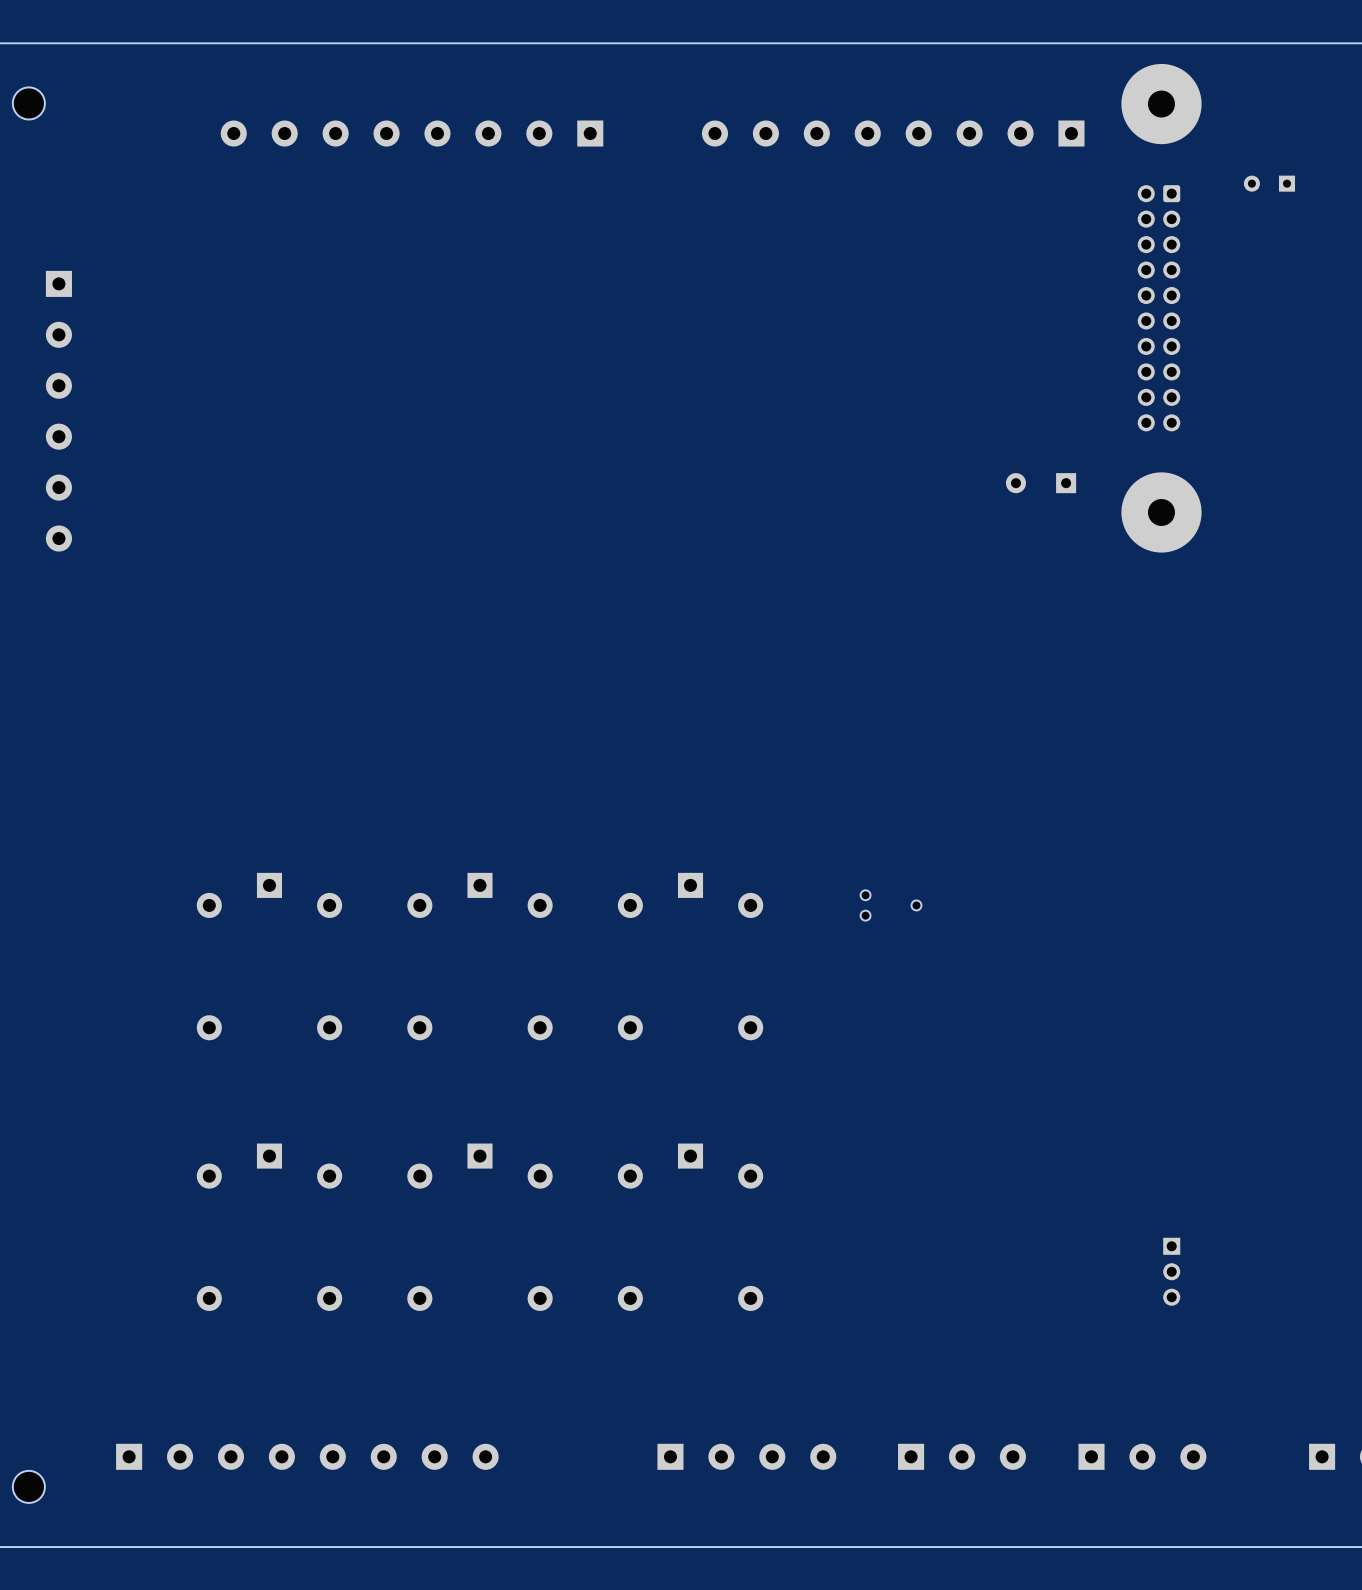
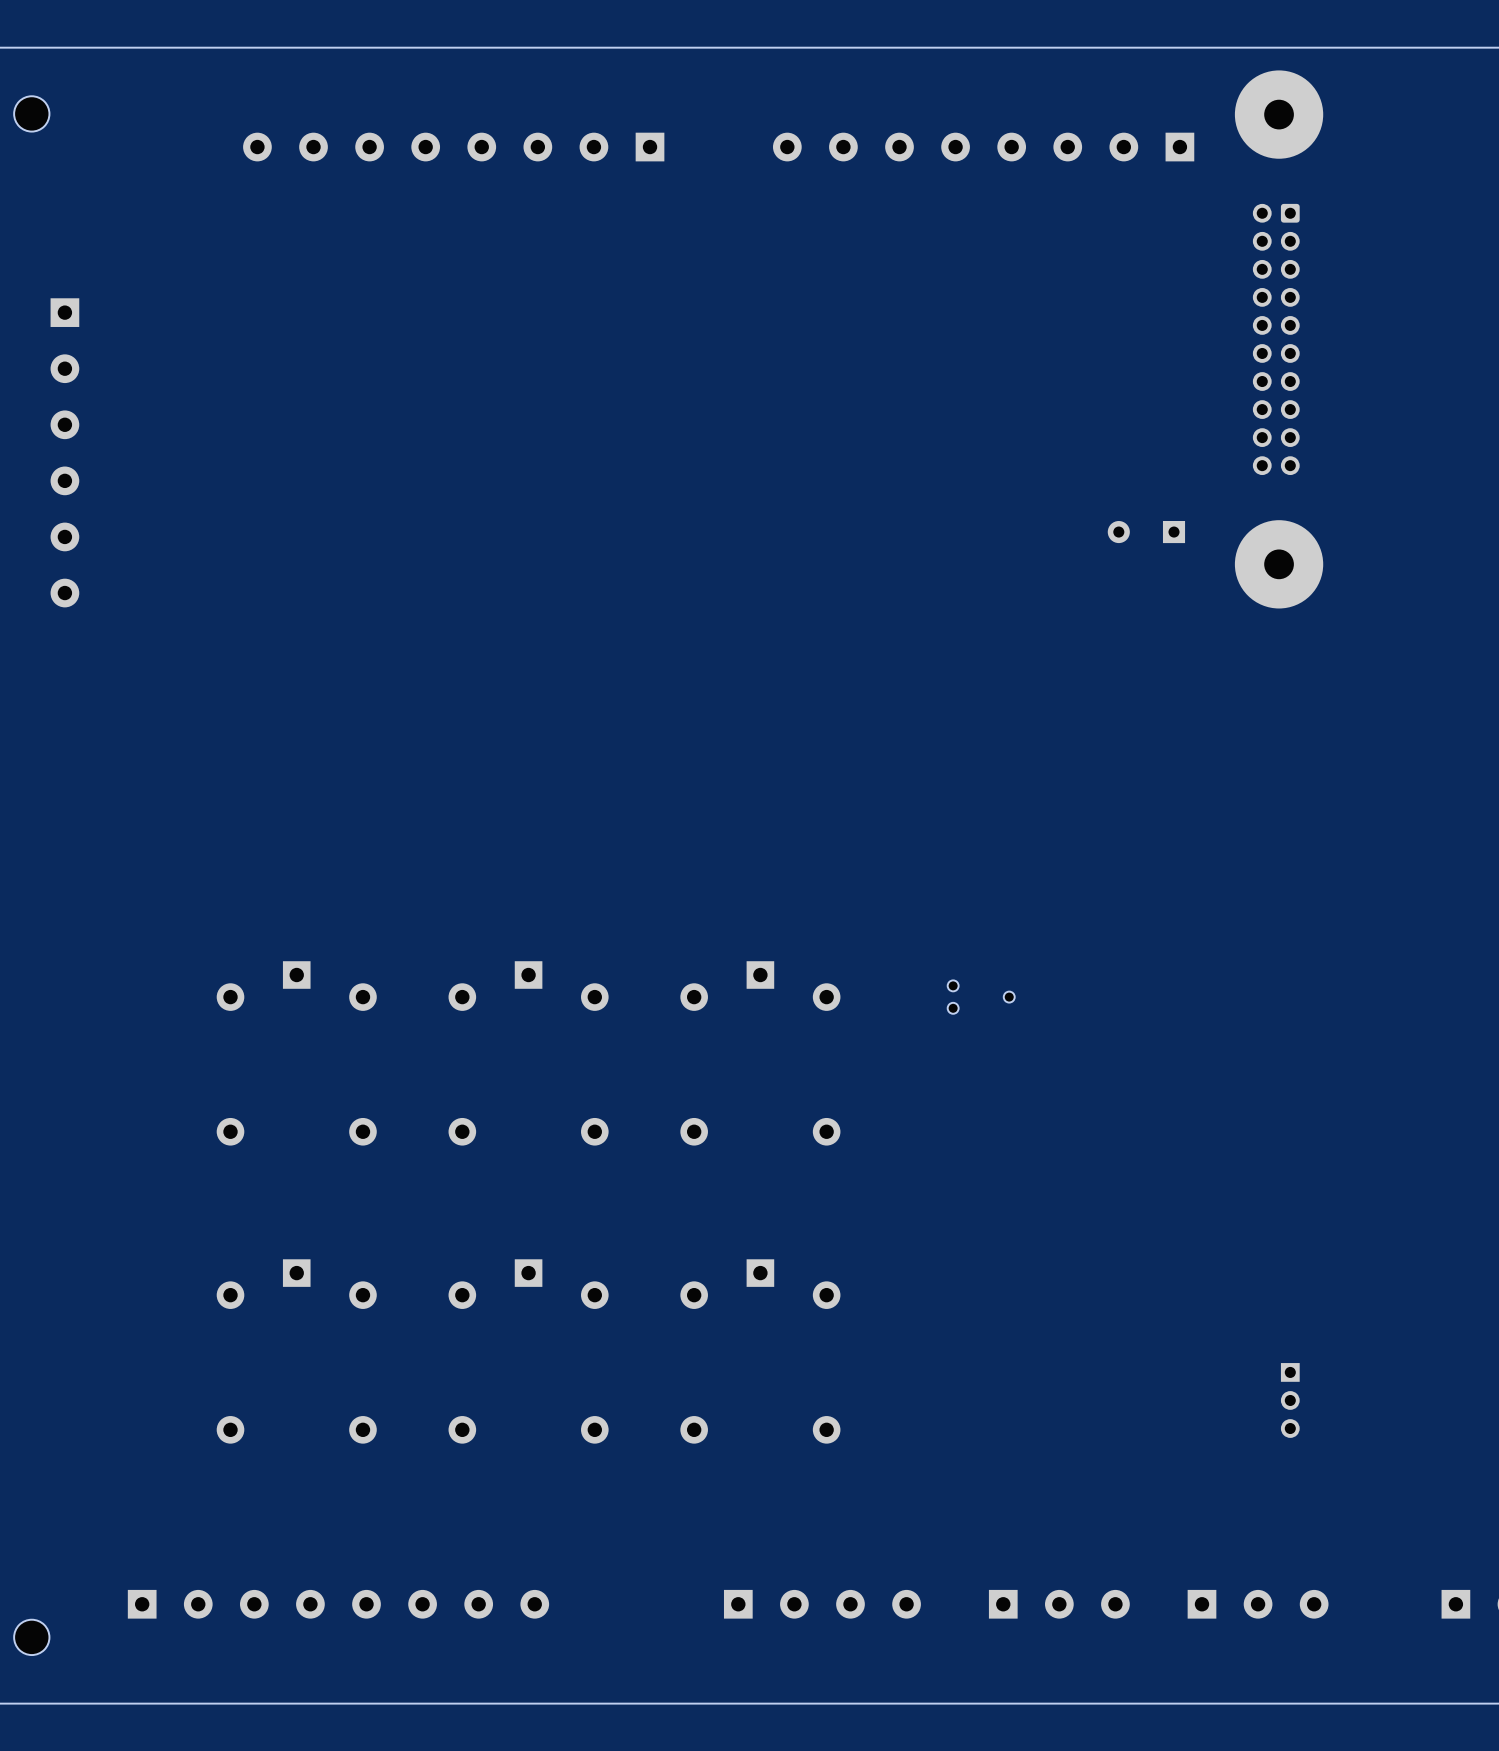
part: (1269, 183) -> none

